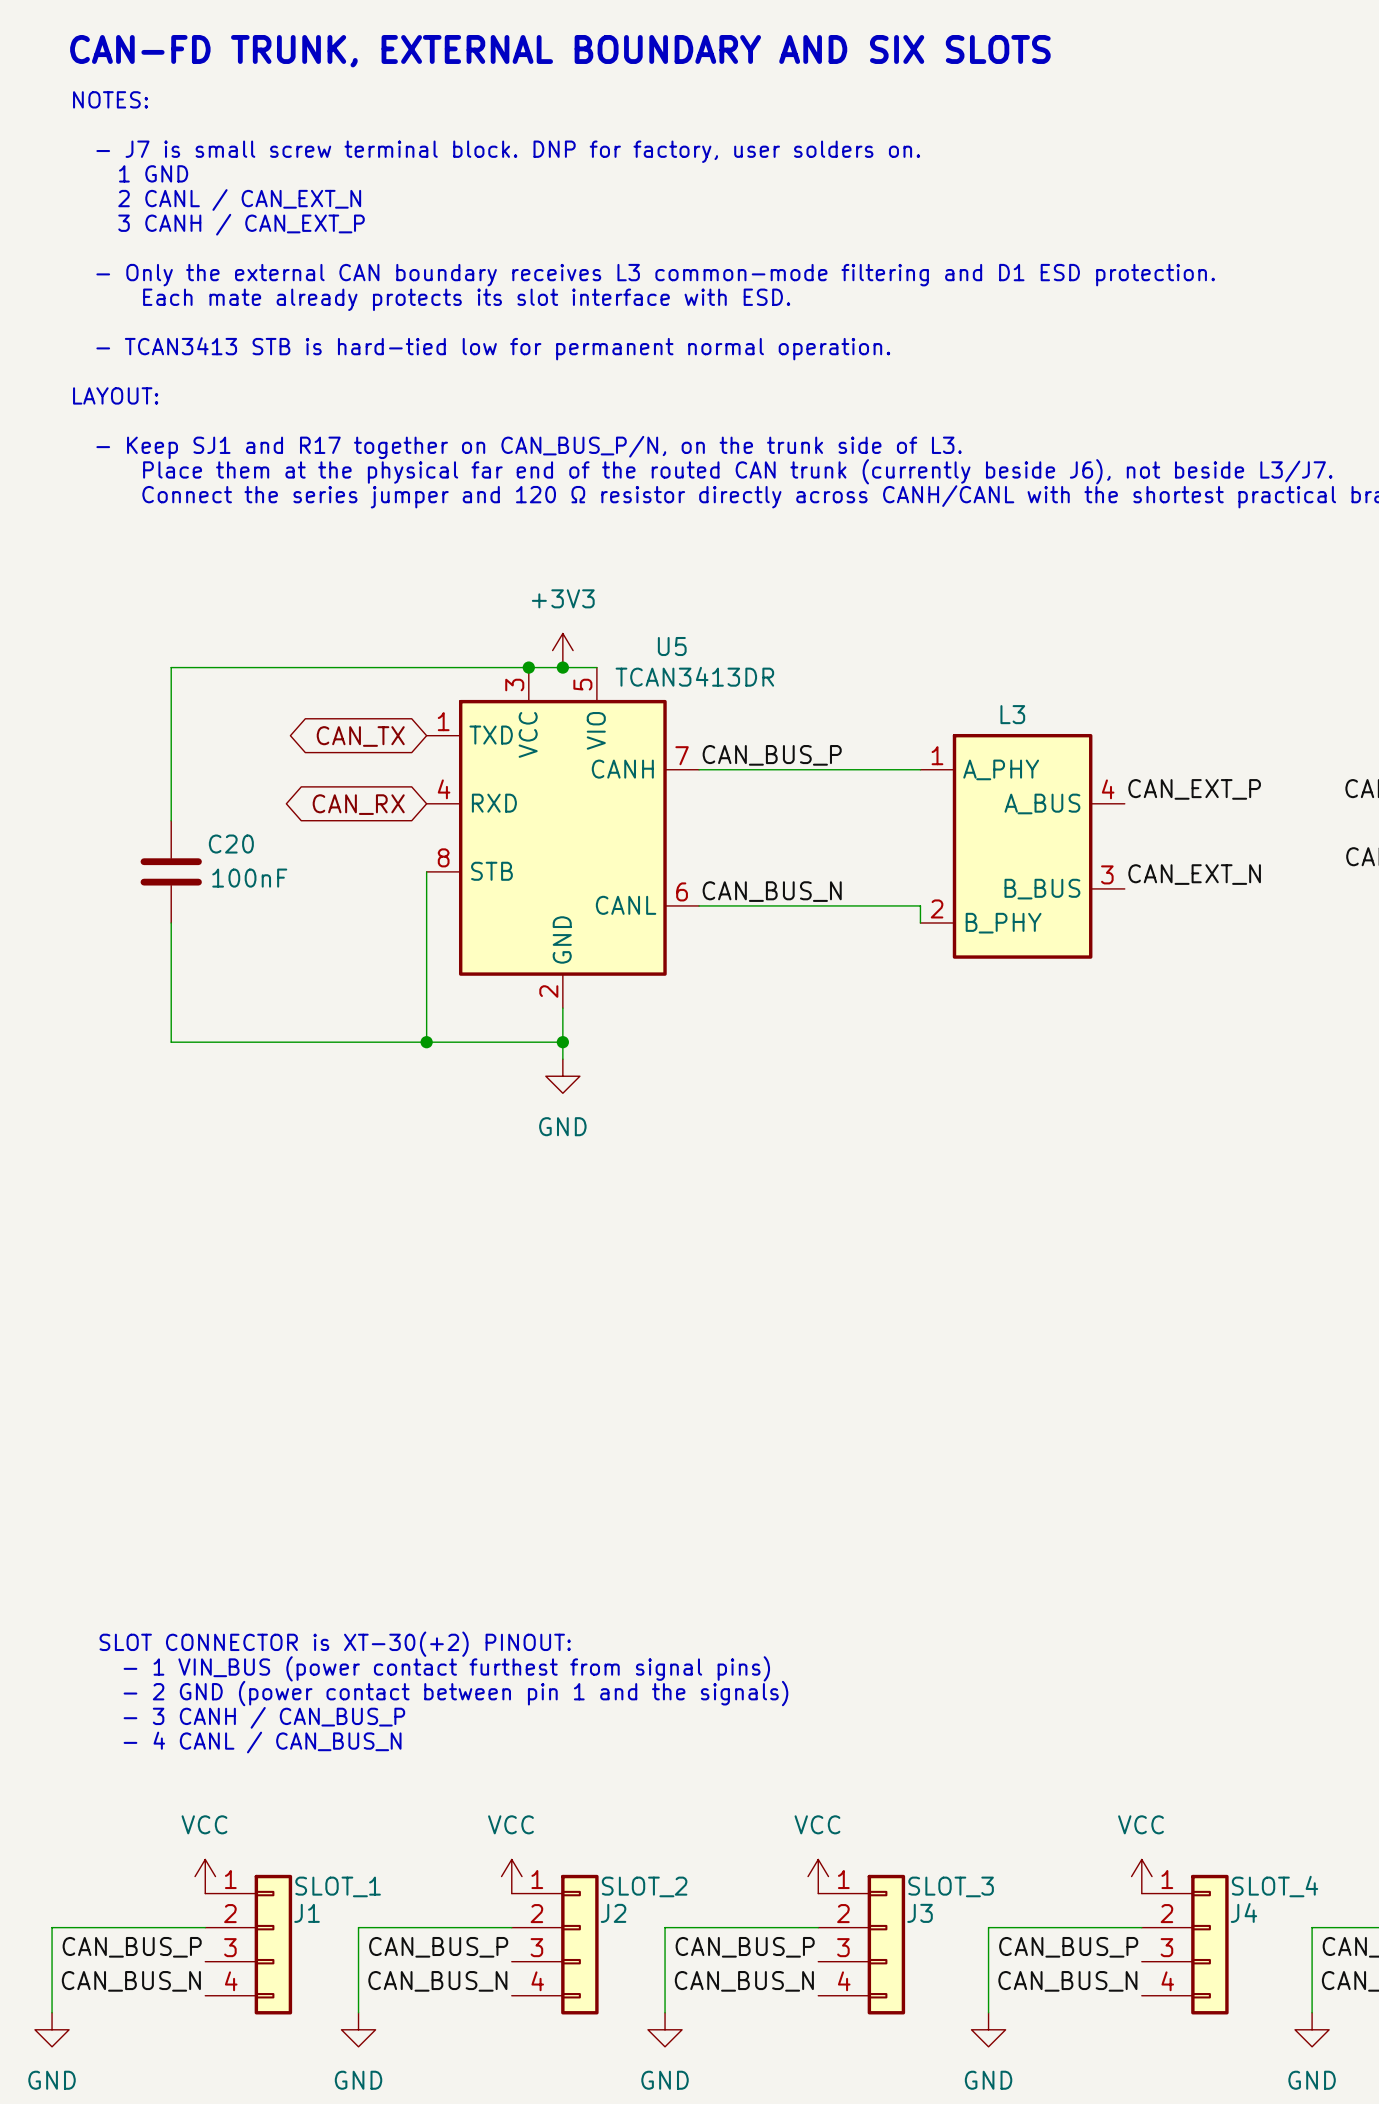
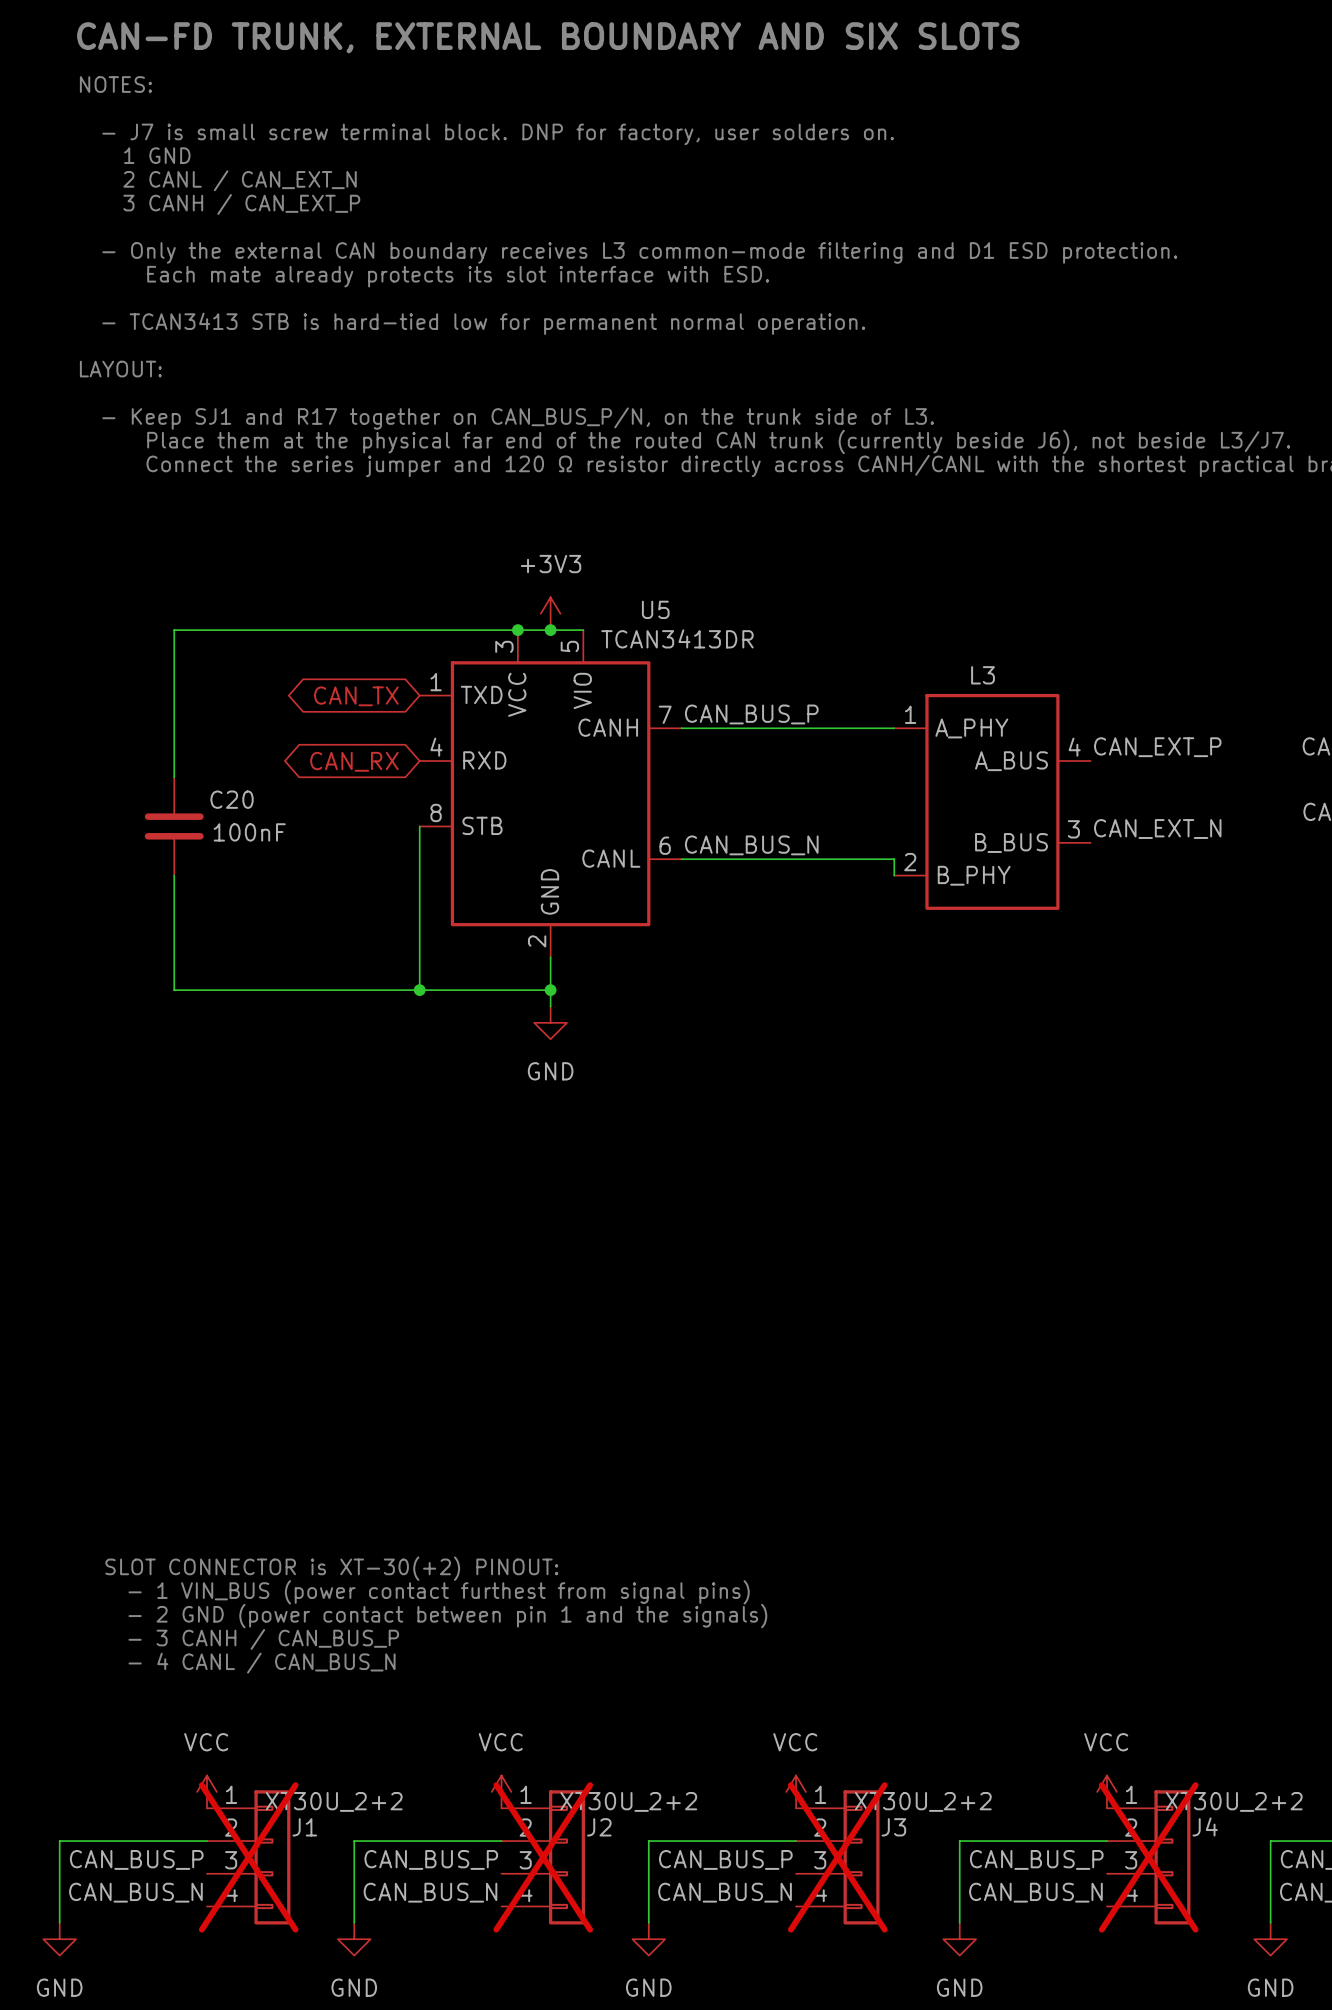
J1 value: SLOT_1 (338, 1886) -> XT30U_2+2 (334, 1801)
J2 value: SLOT_2 (644, 1886) -> XT30U_2+2 (628, 1801)
J3 value: SLOT_3 (951, 1886) -> XT30U_2+2 (923, 1801)
J4 value: SLOT_4 (1275, 1886) -> XT30U_2+2 (1234, 1801)
J1 do-not-place cross: none -> (248, 1857)
J2 do-not-place cross: none -> (543, 1857)
J3 do-not-place cross: none -> (837, 1857)
J4 do-not-place cross: none -> (1148, 1857)

